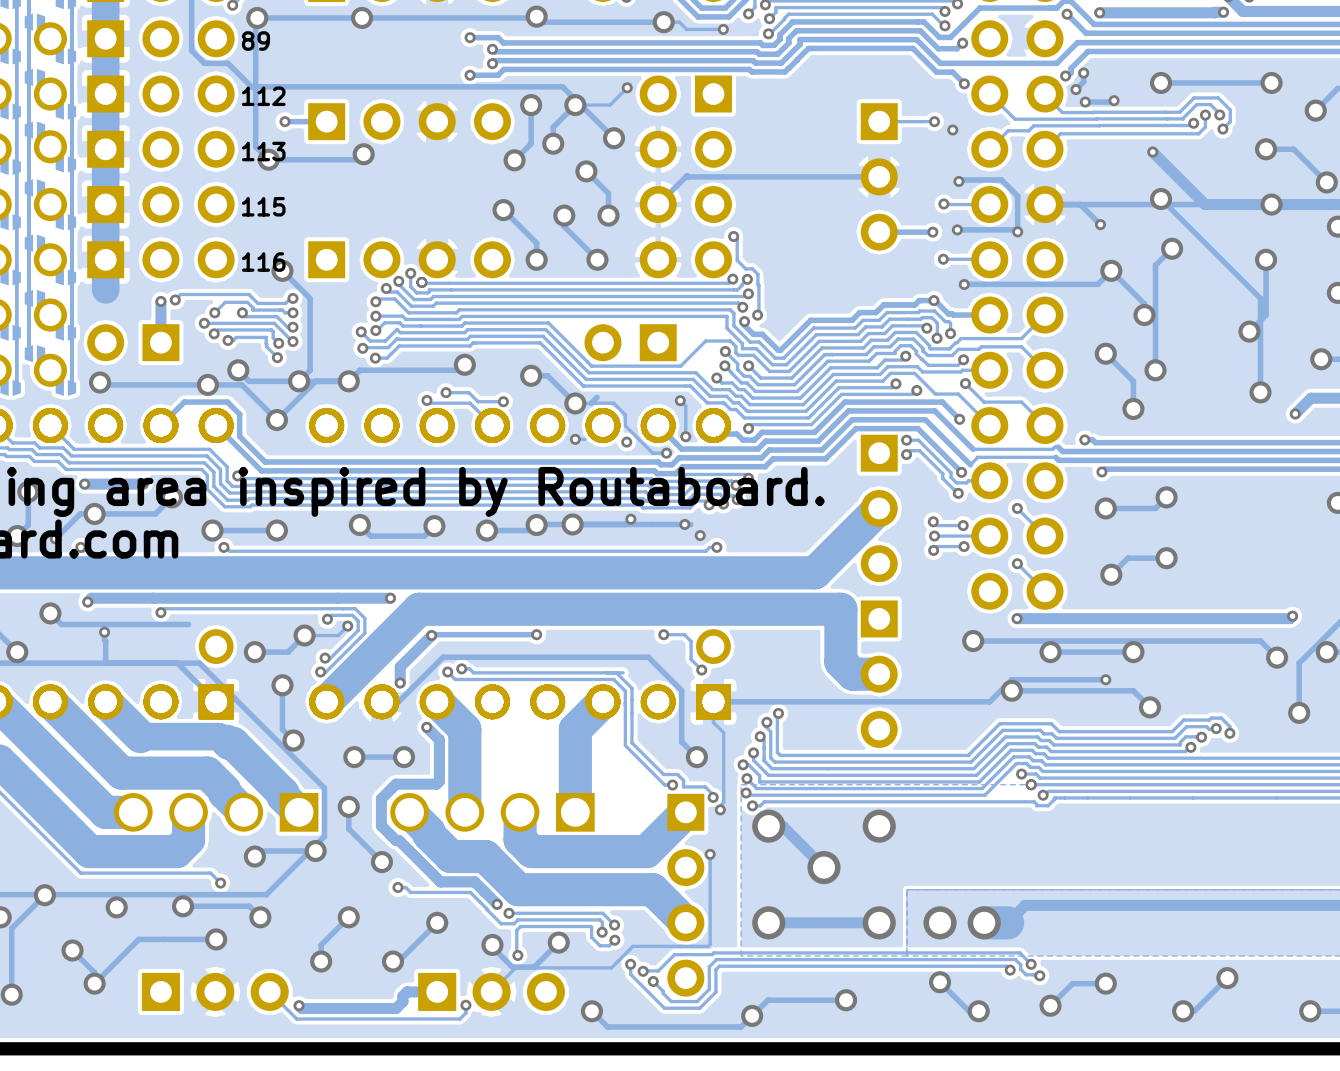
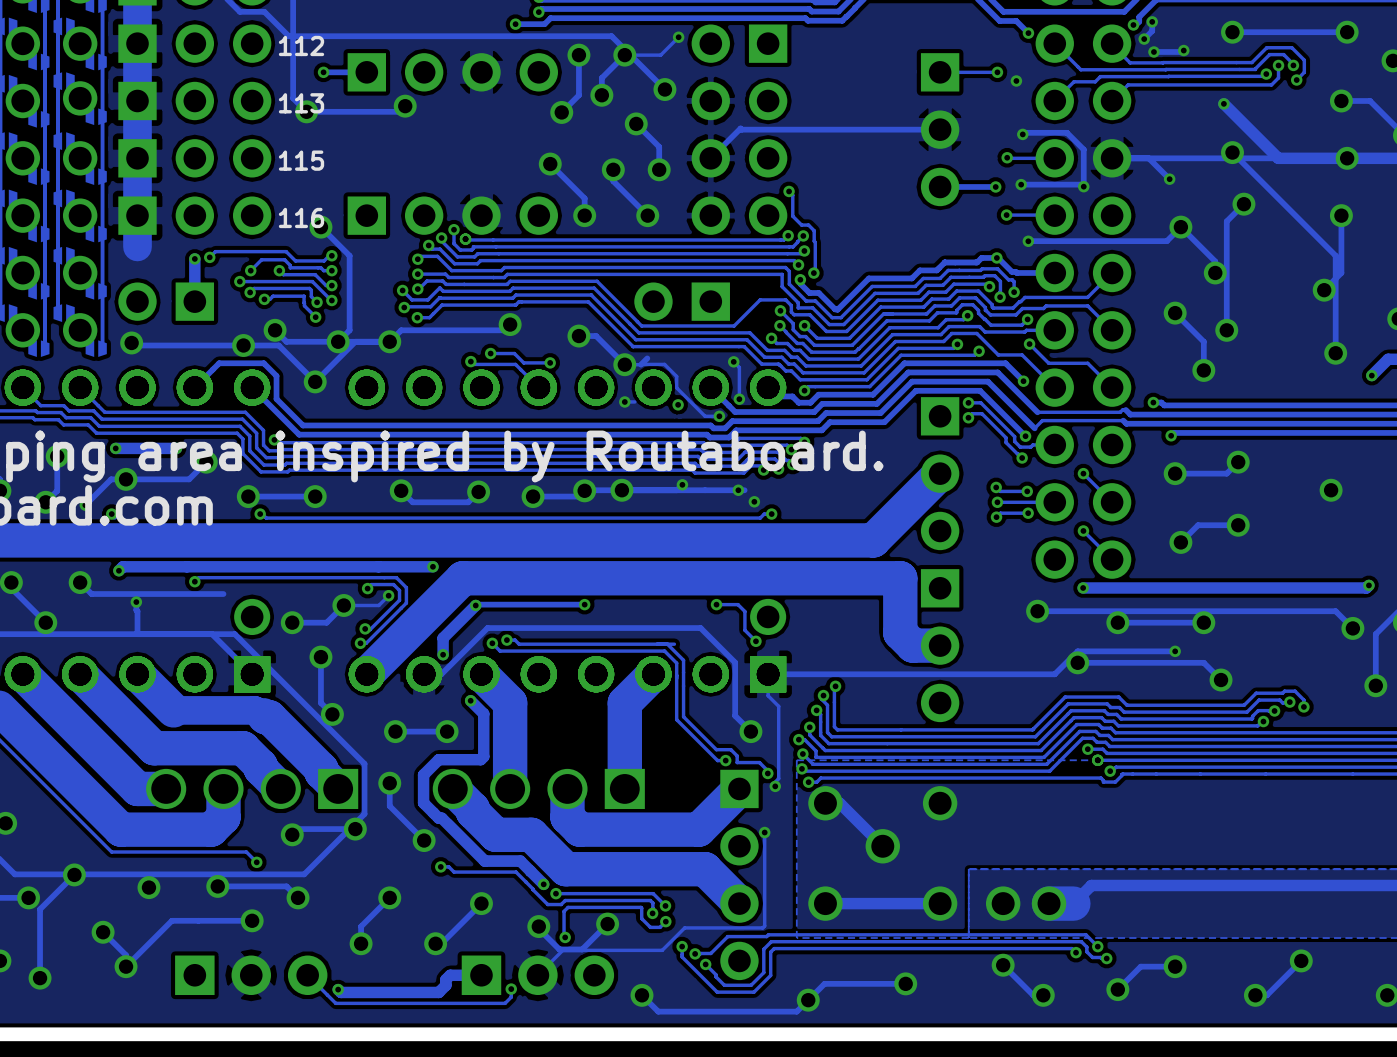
via: none -> (1331, 490)

